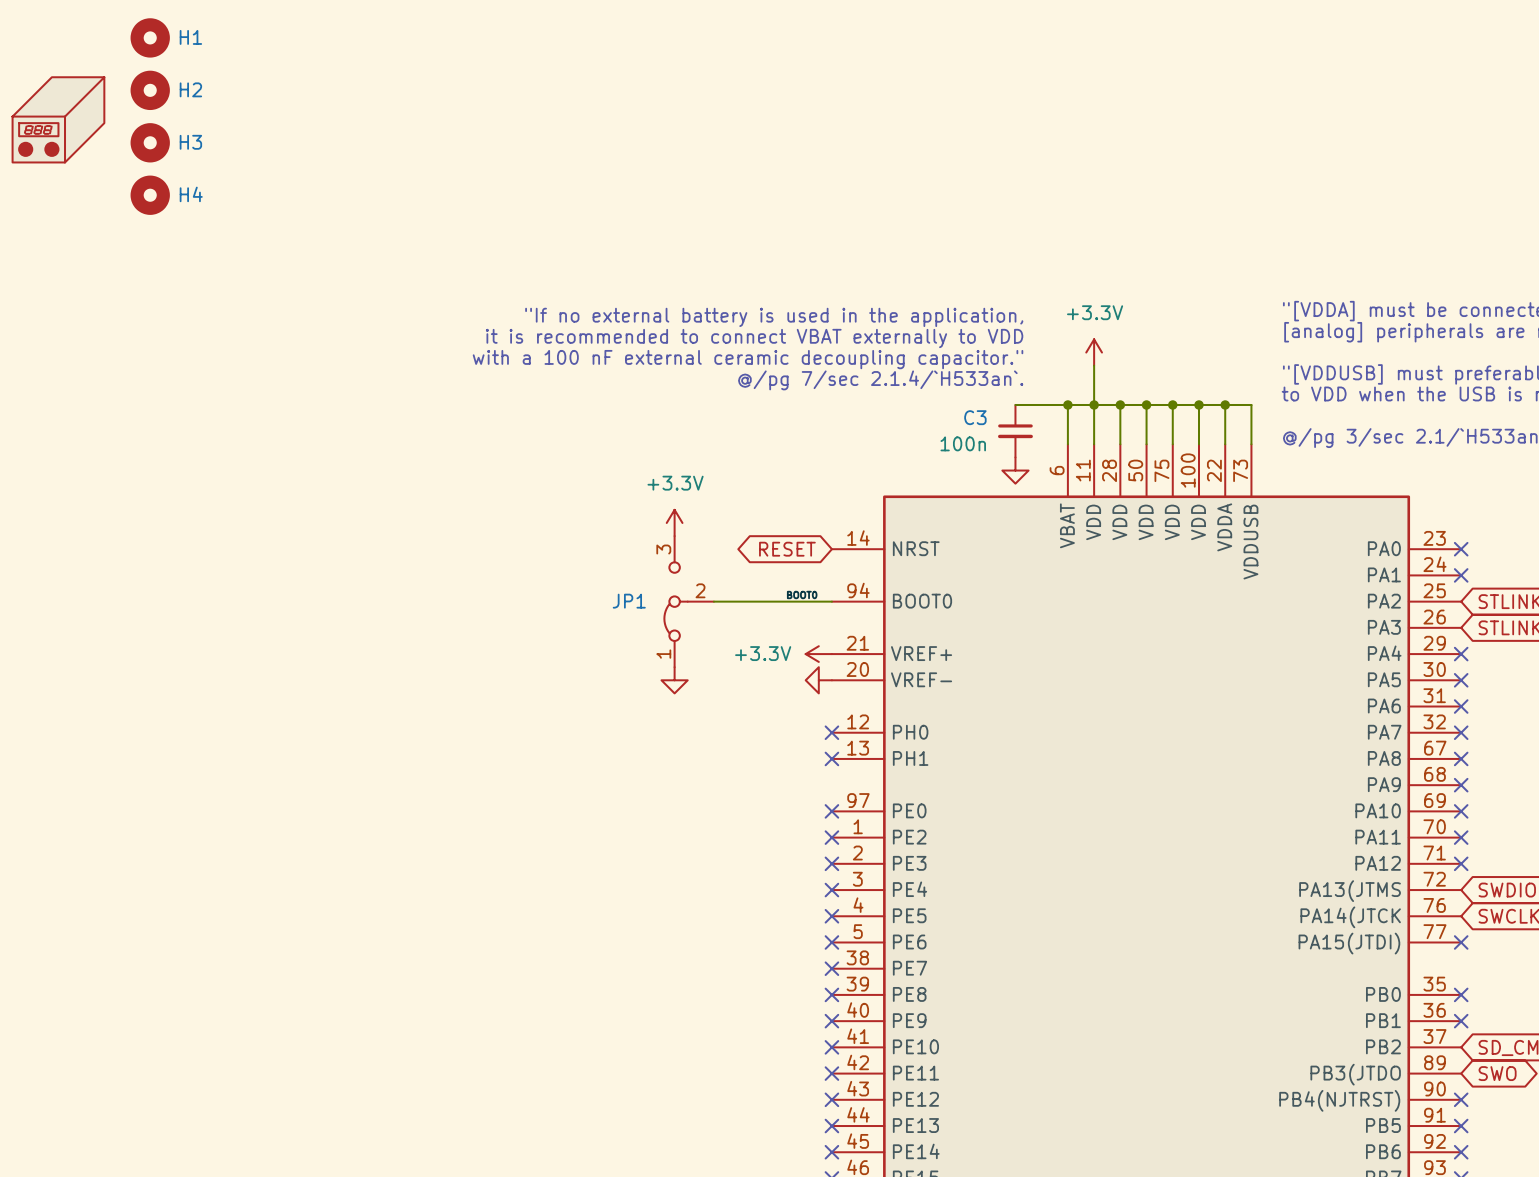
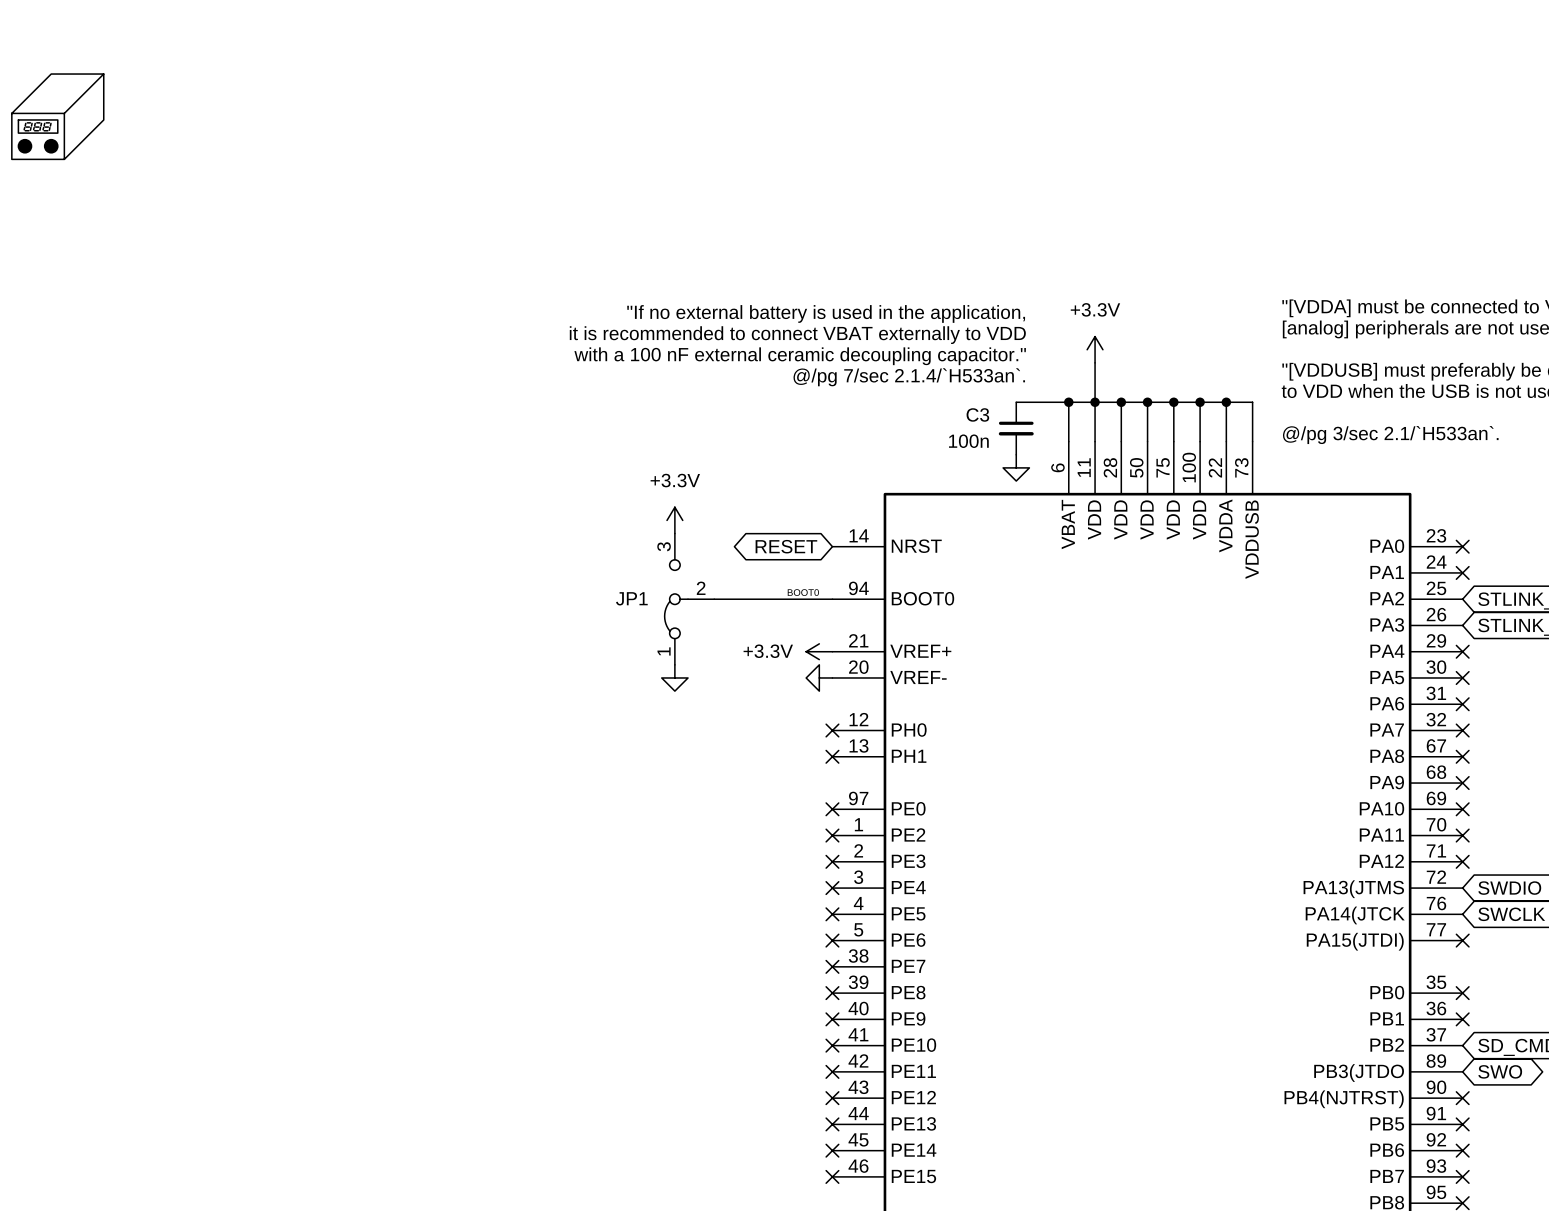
H1: (150, 37) -> none
H2: (150, 90) -> none
H3: (150, 142) -> none
H4: (150, 195) -> none

